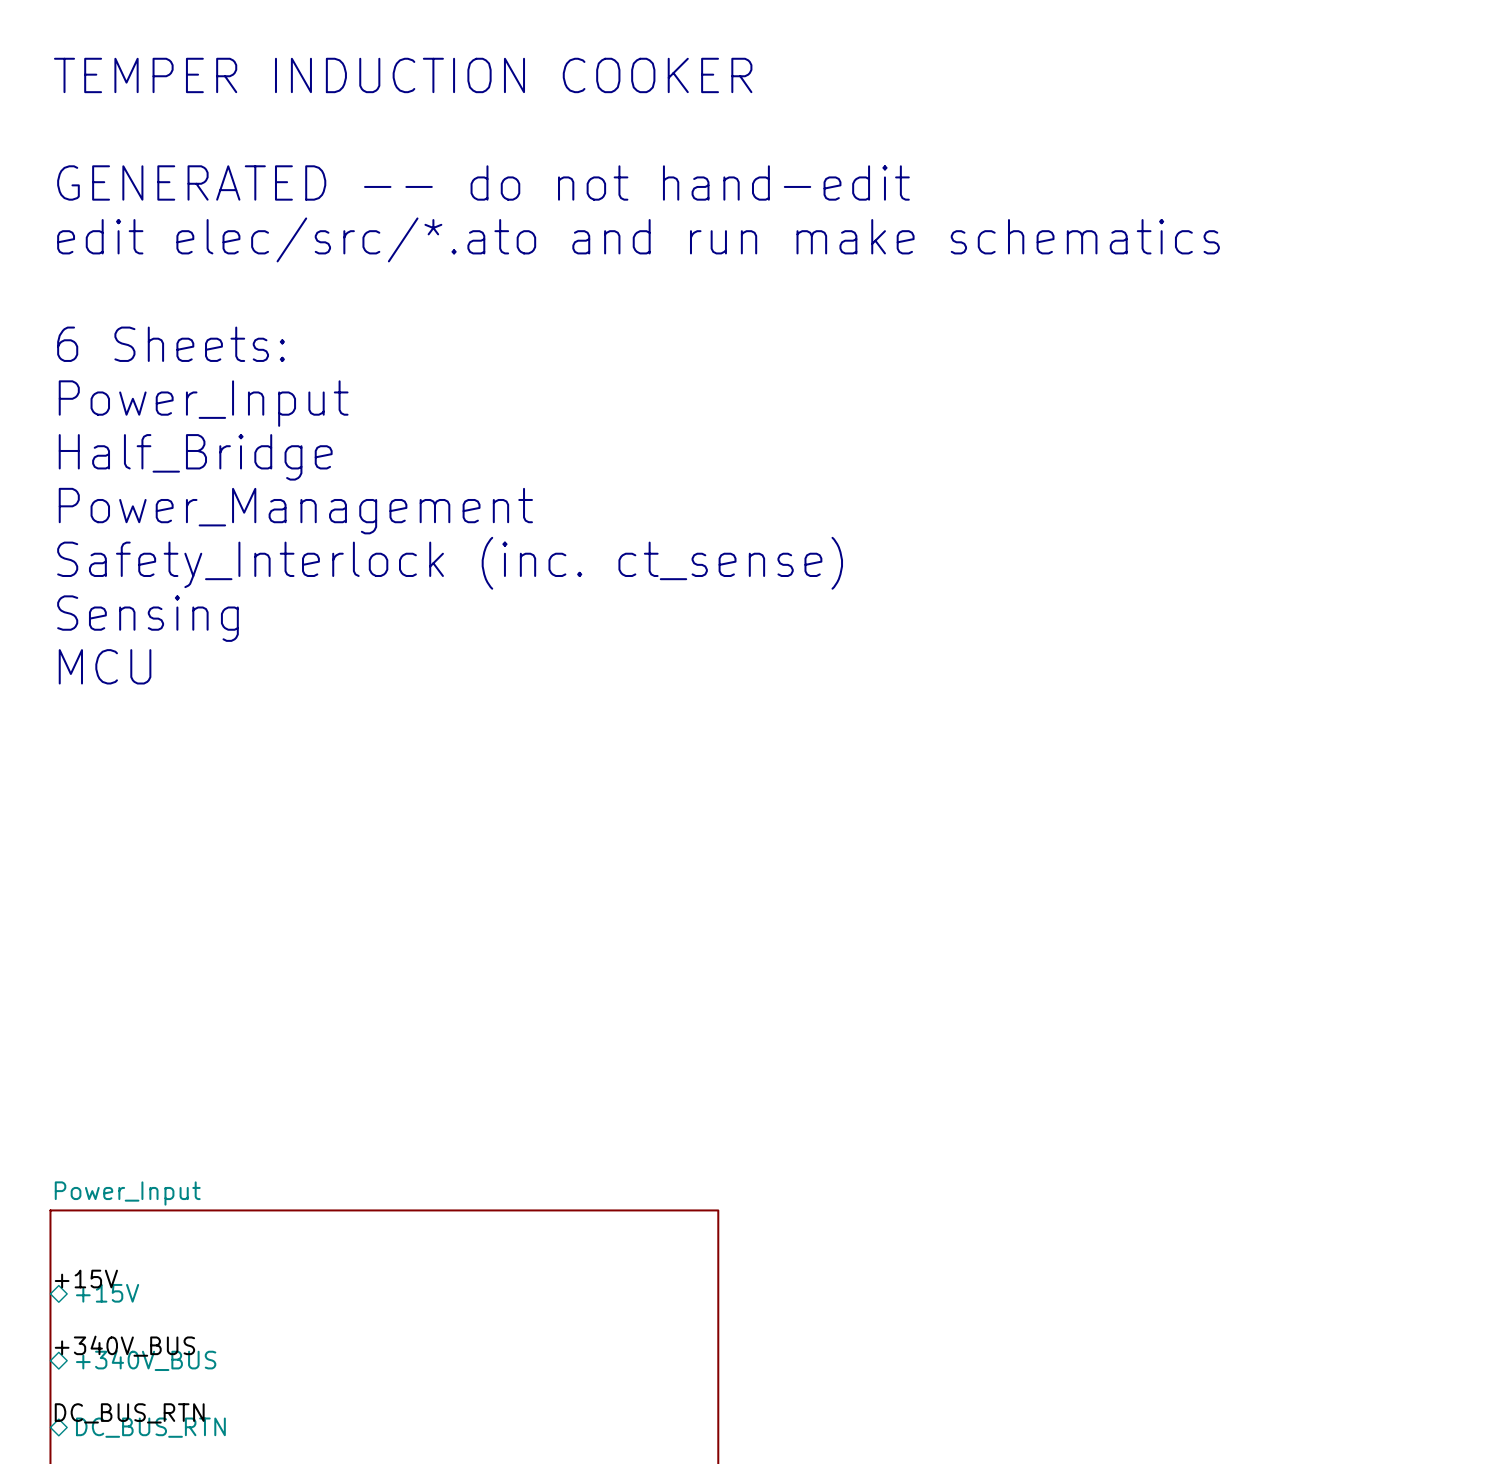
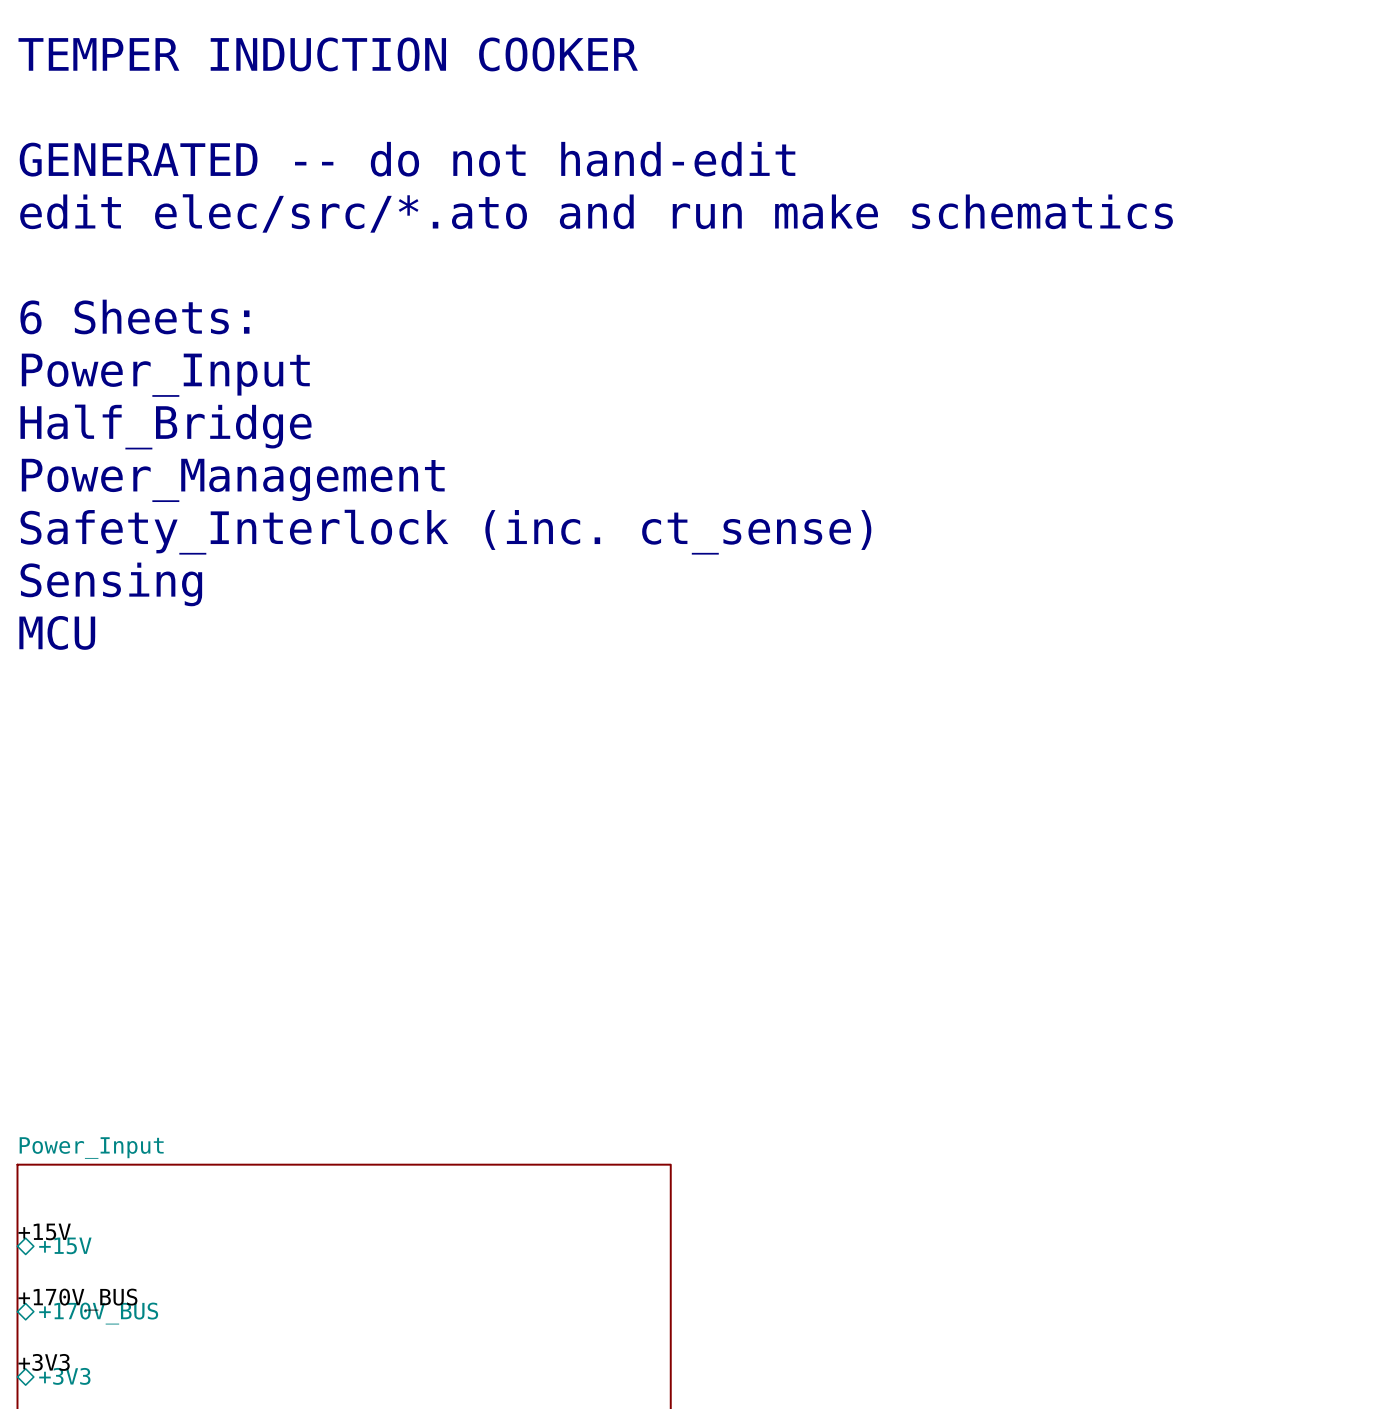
label: +340V_BUS (124, 1346) -> +170V_BUS (77, 1299)
sheet pin: +340V_BUS (146, 1360) -> +170V_BUS (98, 1313)
label: DC_BUS_RTN (129, 1413) -> +3V3 (44, 1362)
sheet pin: DC_BUS_RTN (150, 1427) -> +3V3 (64, 1376)

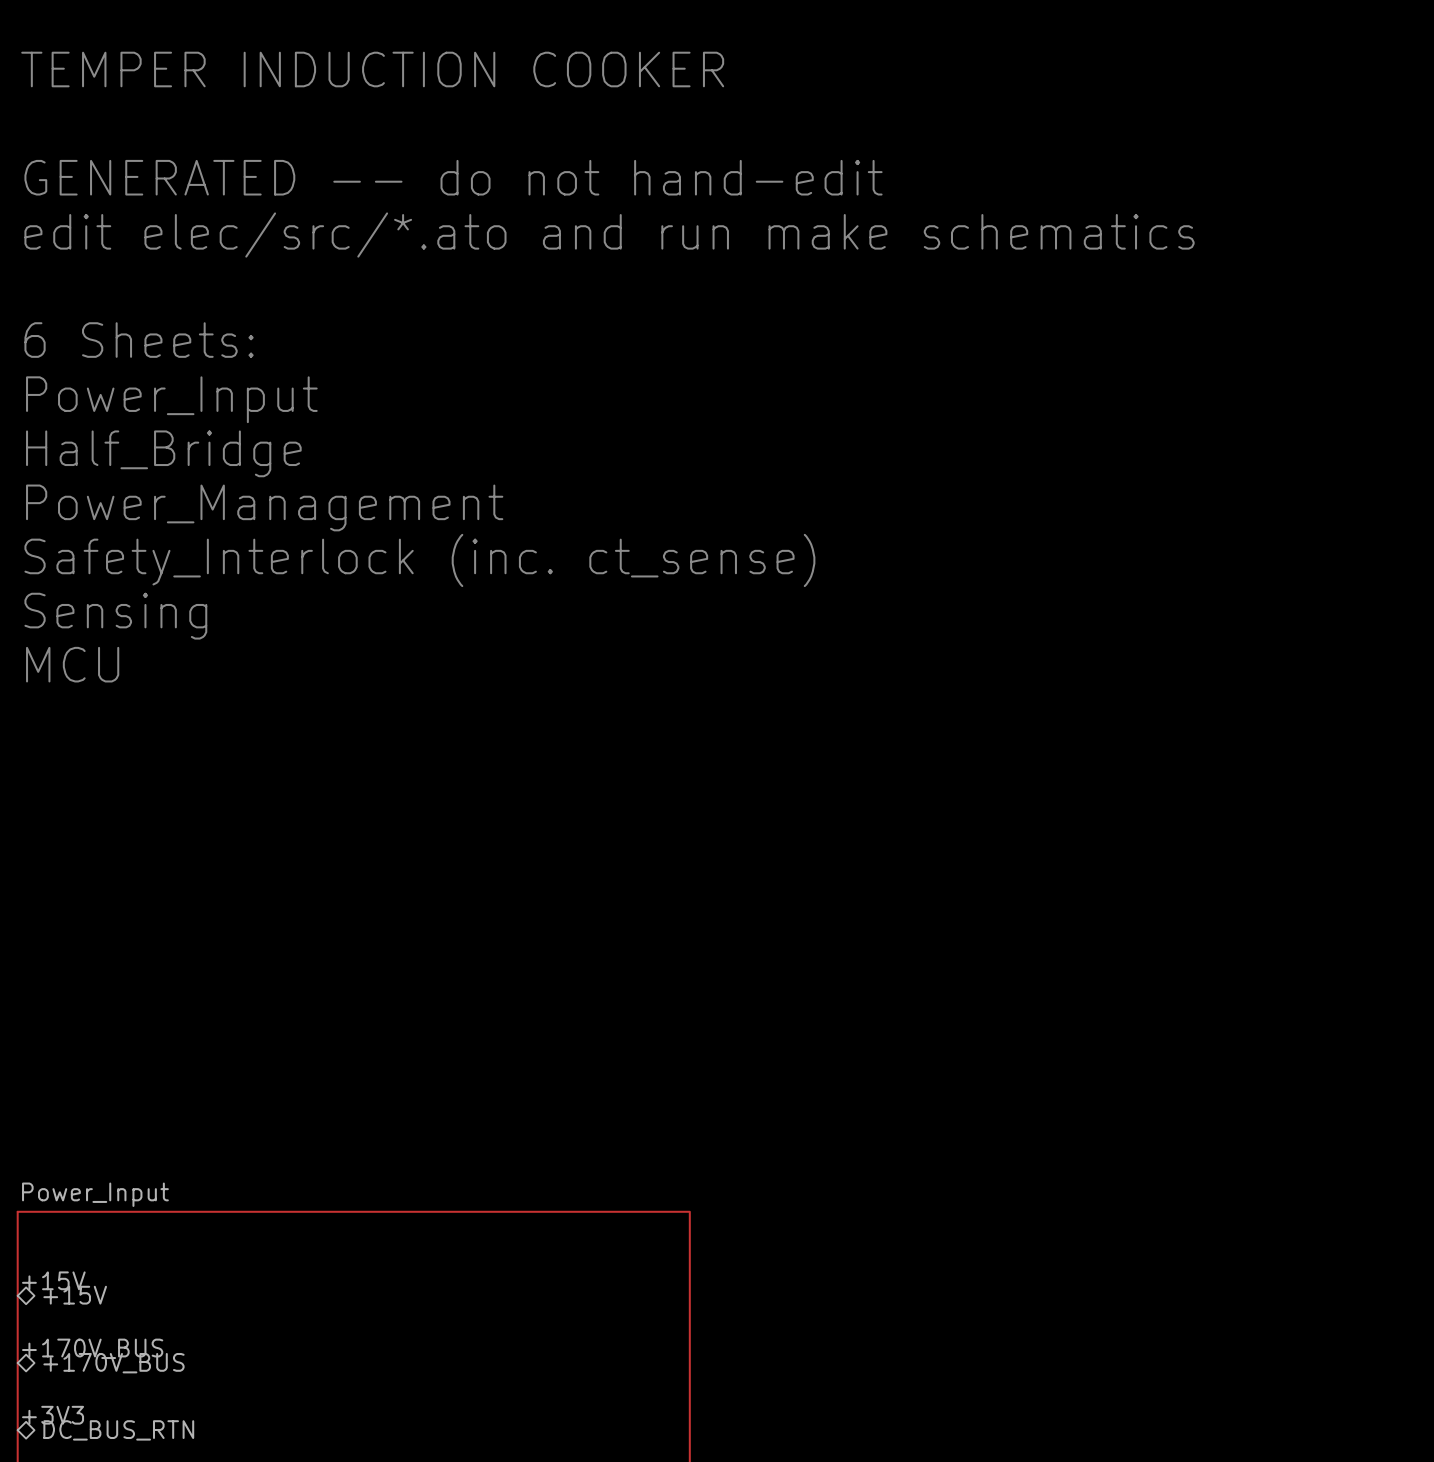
sheet pin: +3V3 (64, 1376) -> DC_BUS_RTN (118, 1430)

